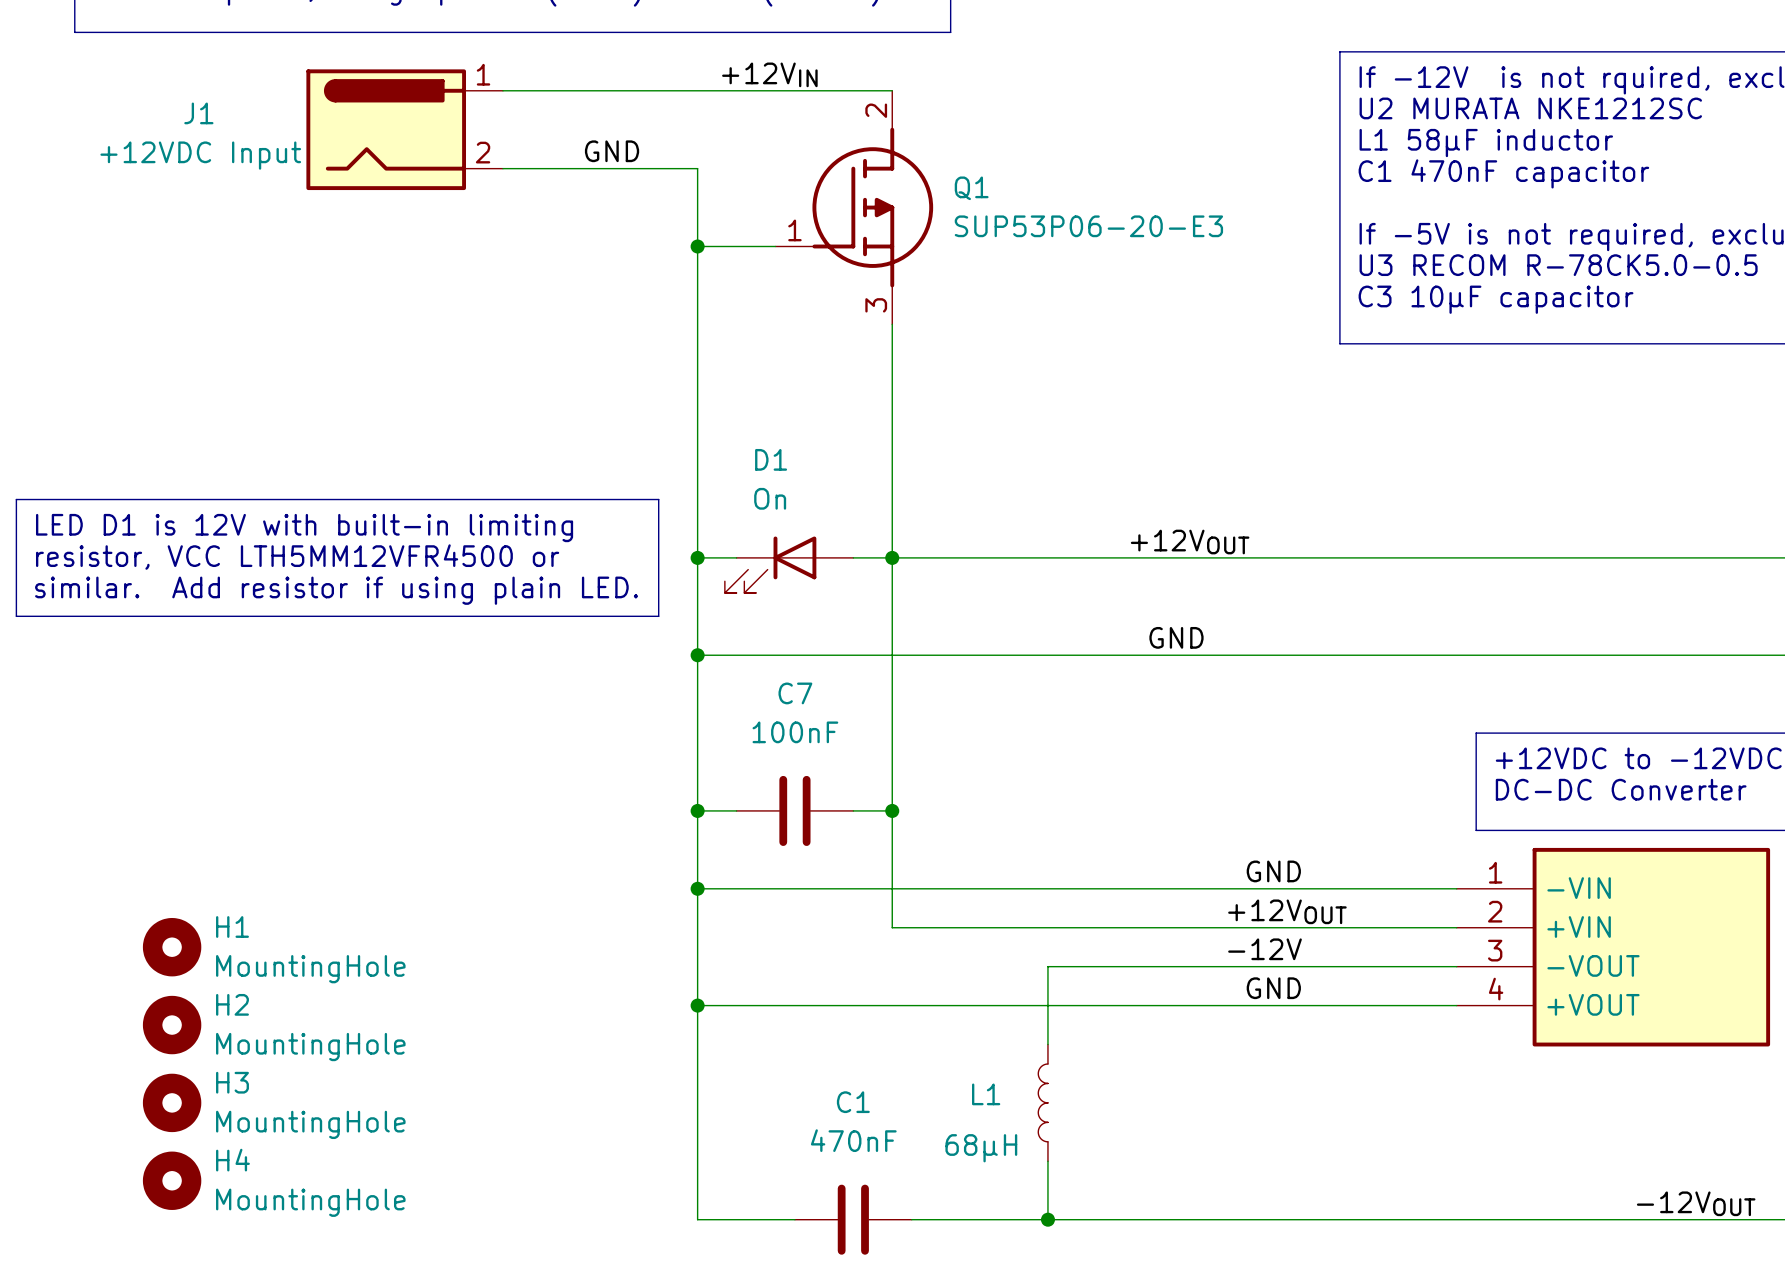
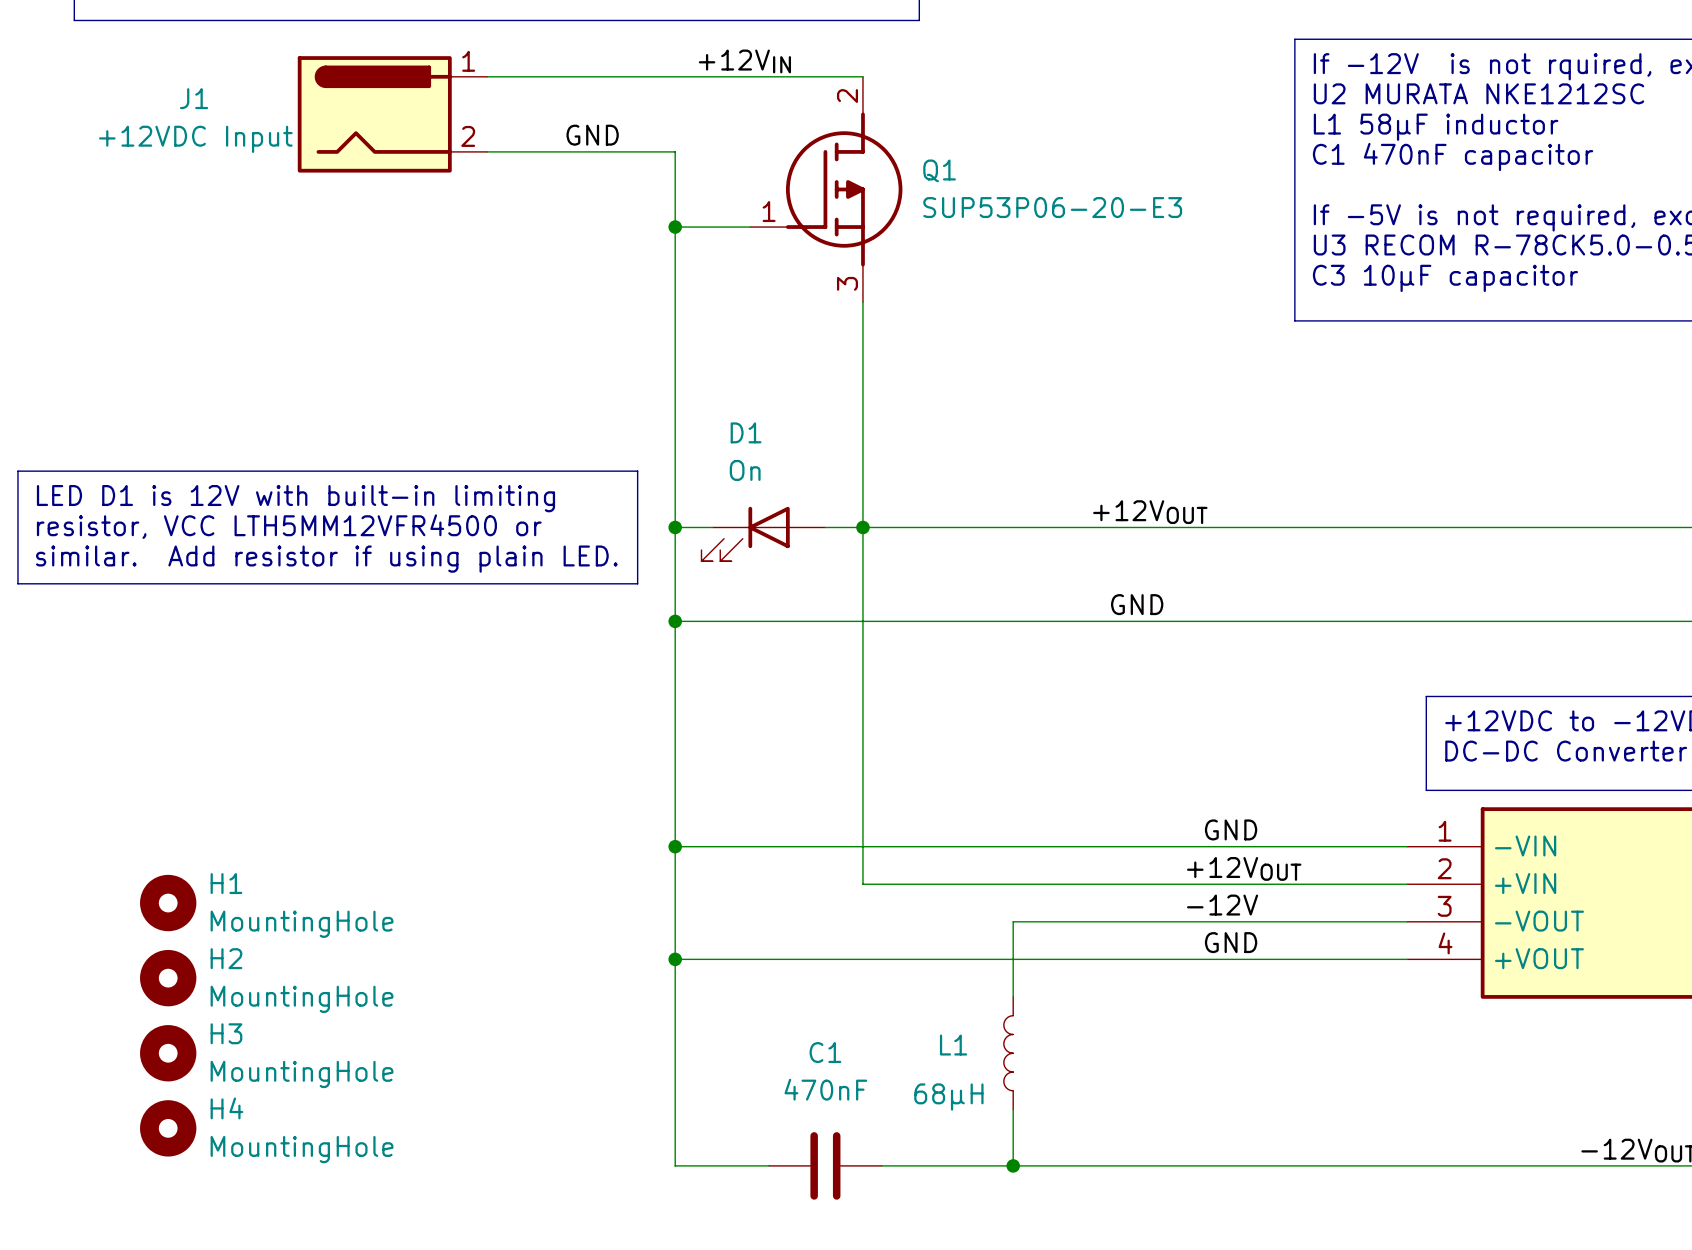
wire: (697, 810) (736, 810) -> none
junction: (697, 810) -> none
C7: 100nF (794, 810) -> none
wire: (853, 810) (892, 810) -> none
junction: (892, 810) -> none

